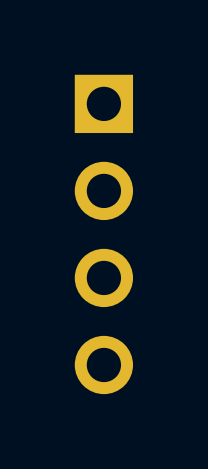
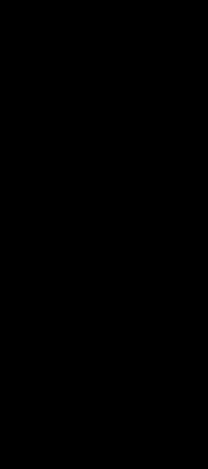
part: (103, 234) -> none

